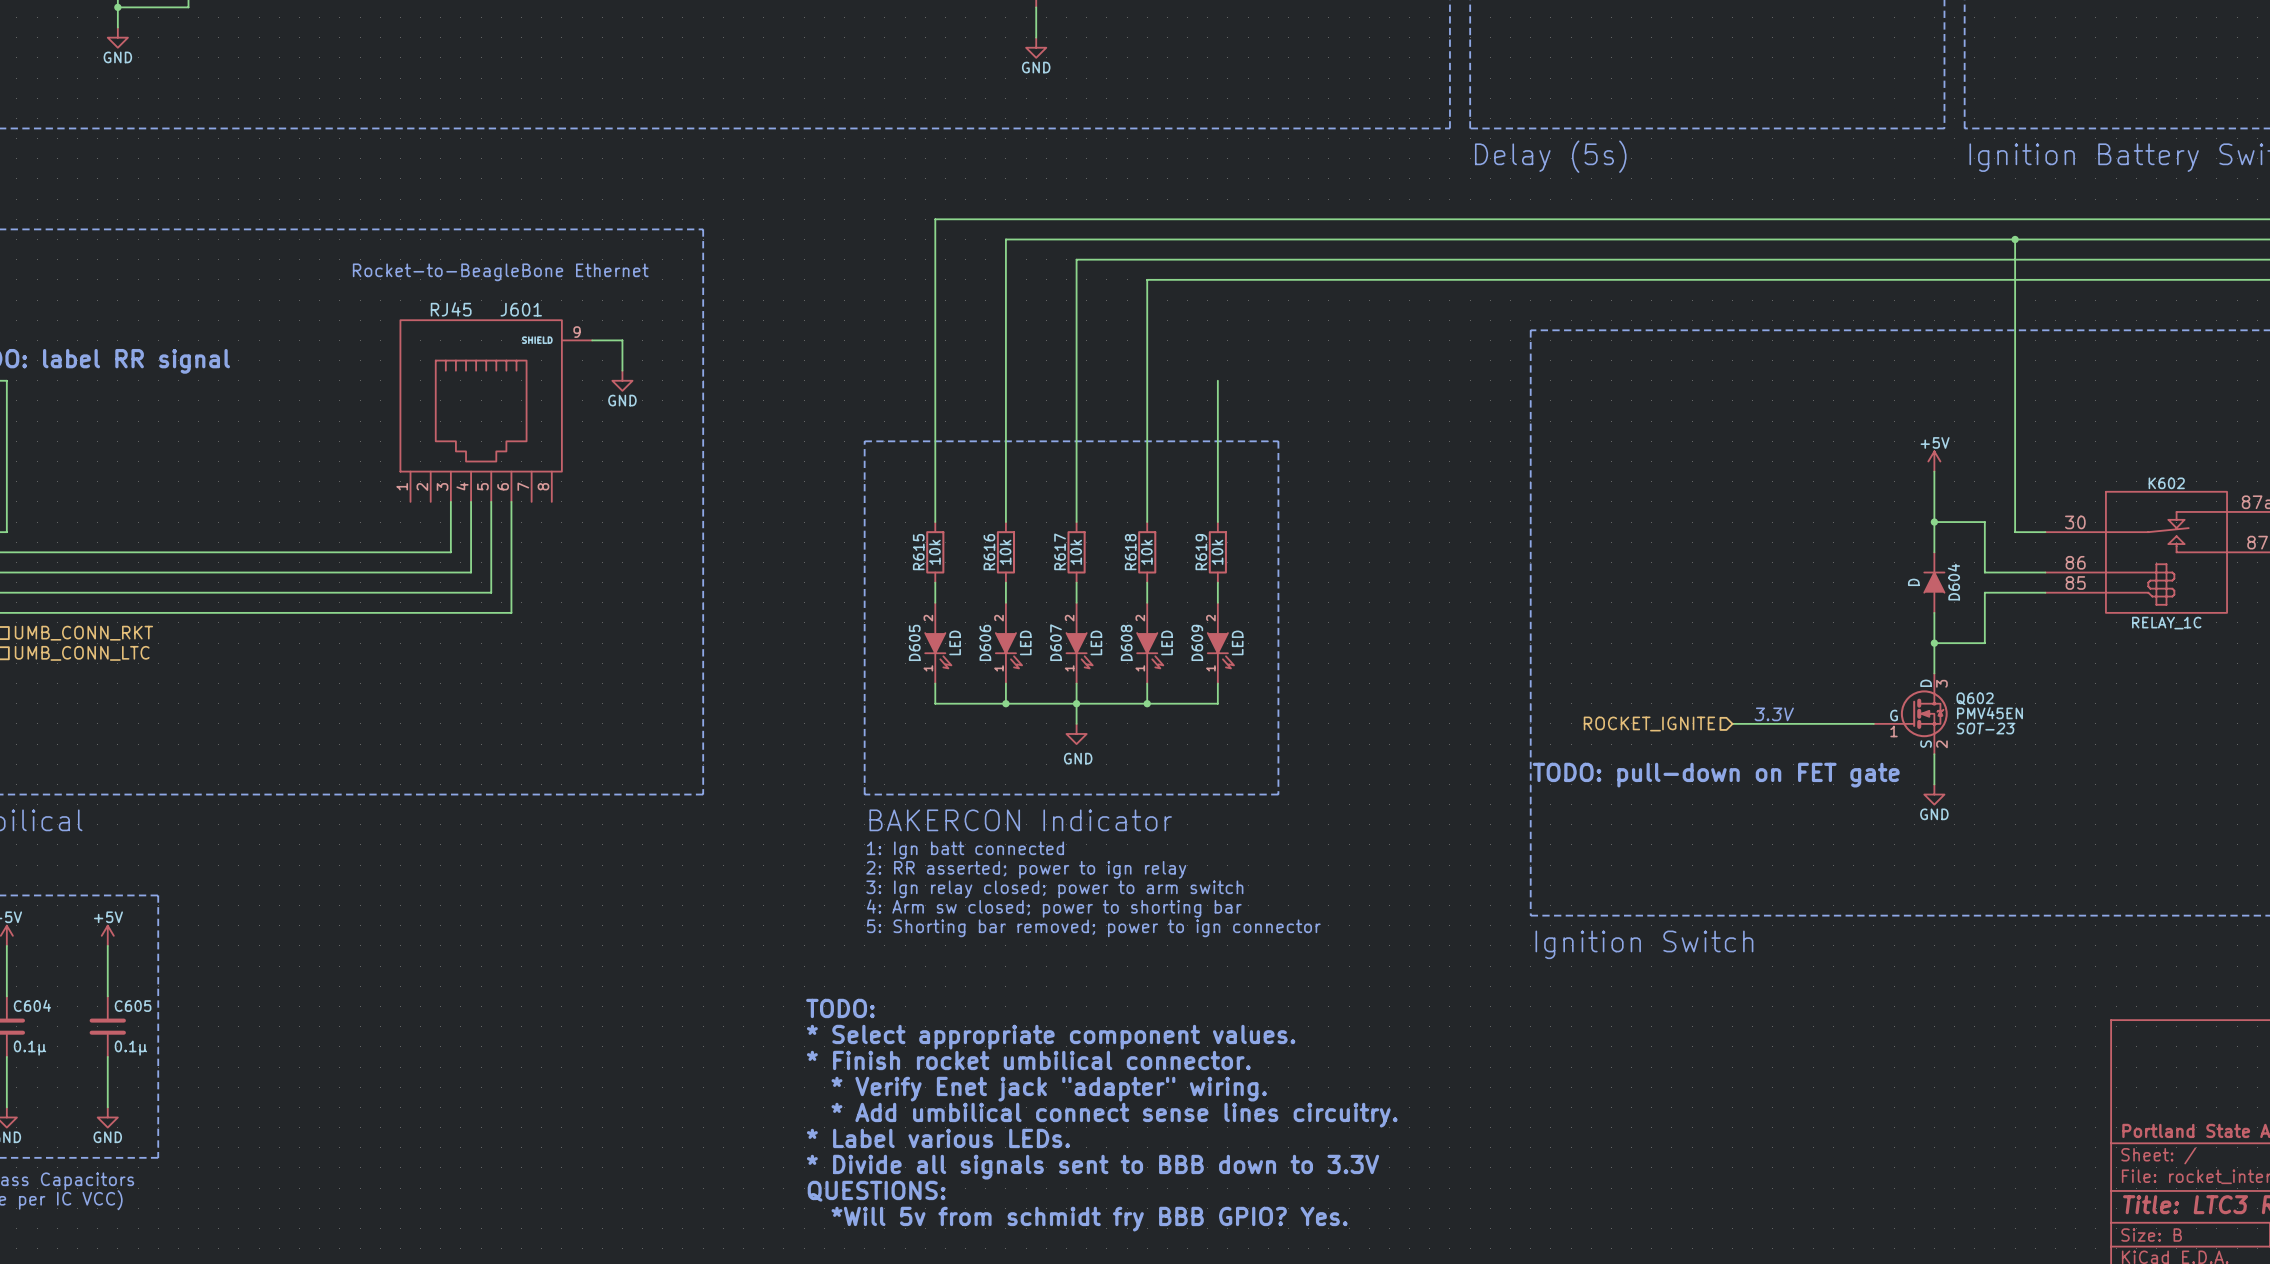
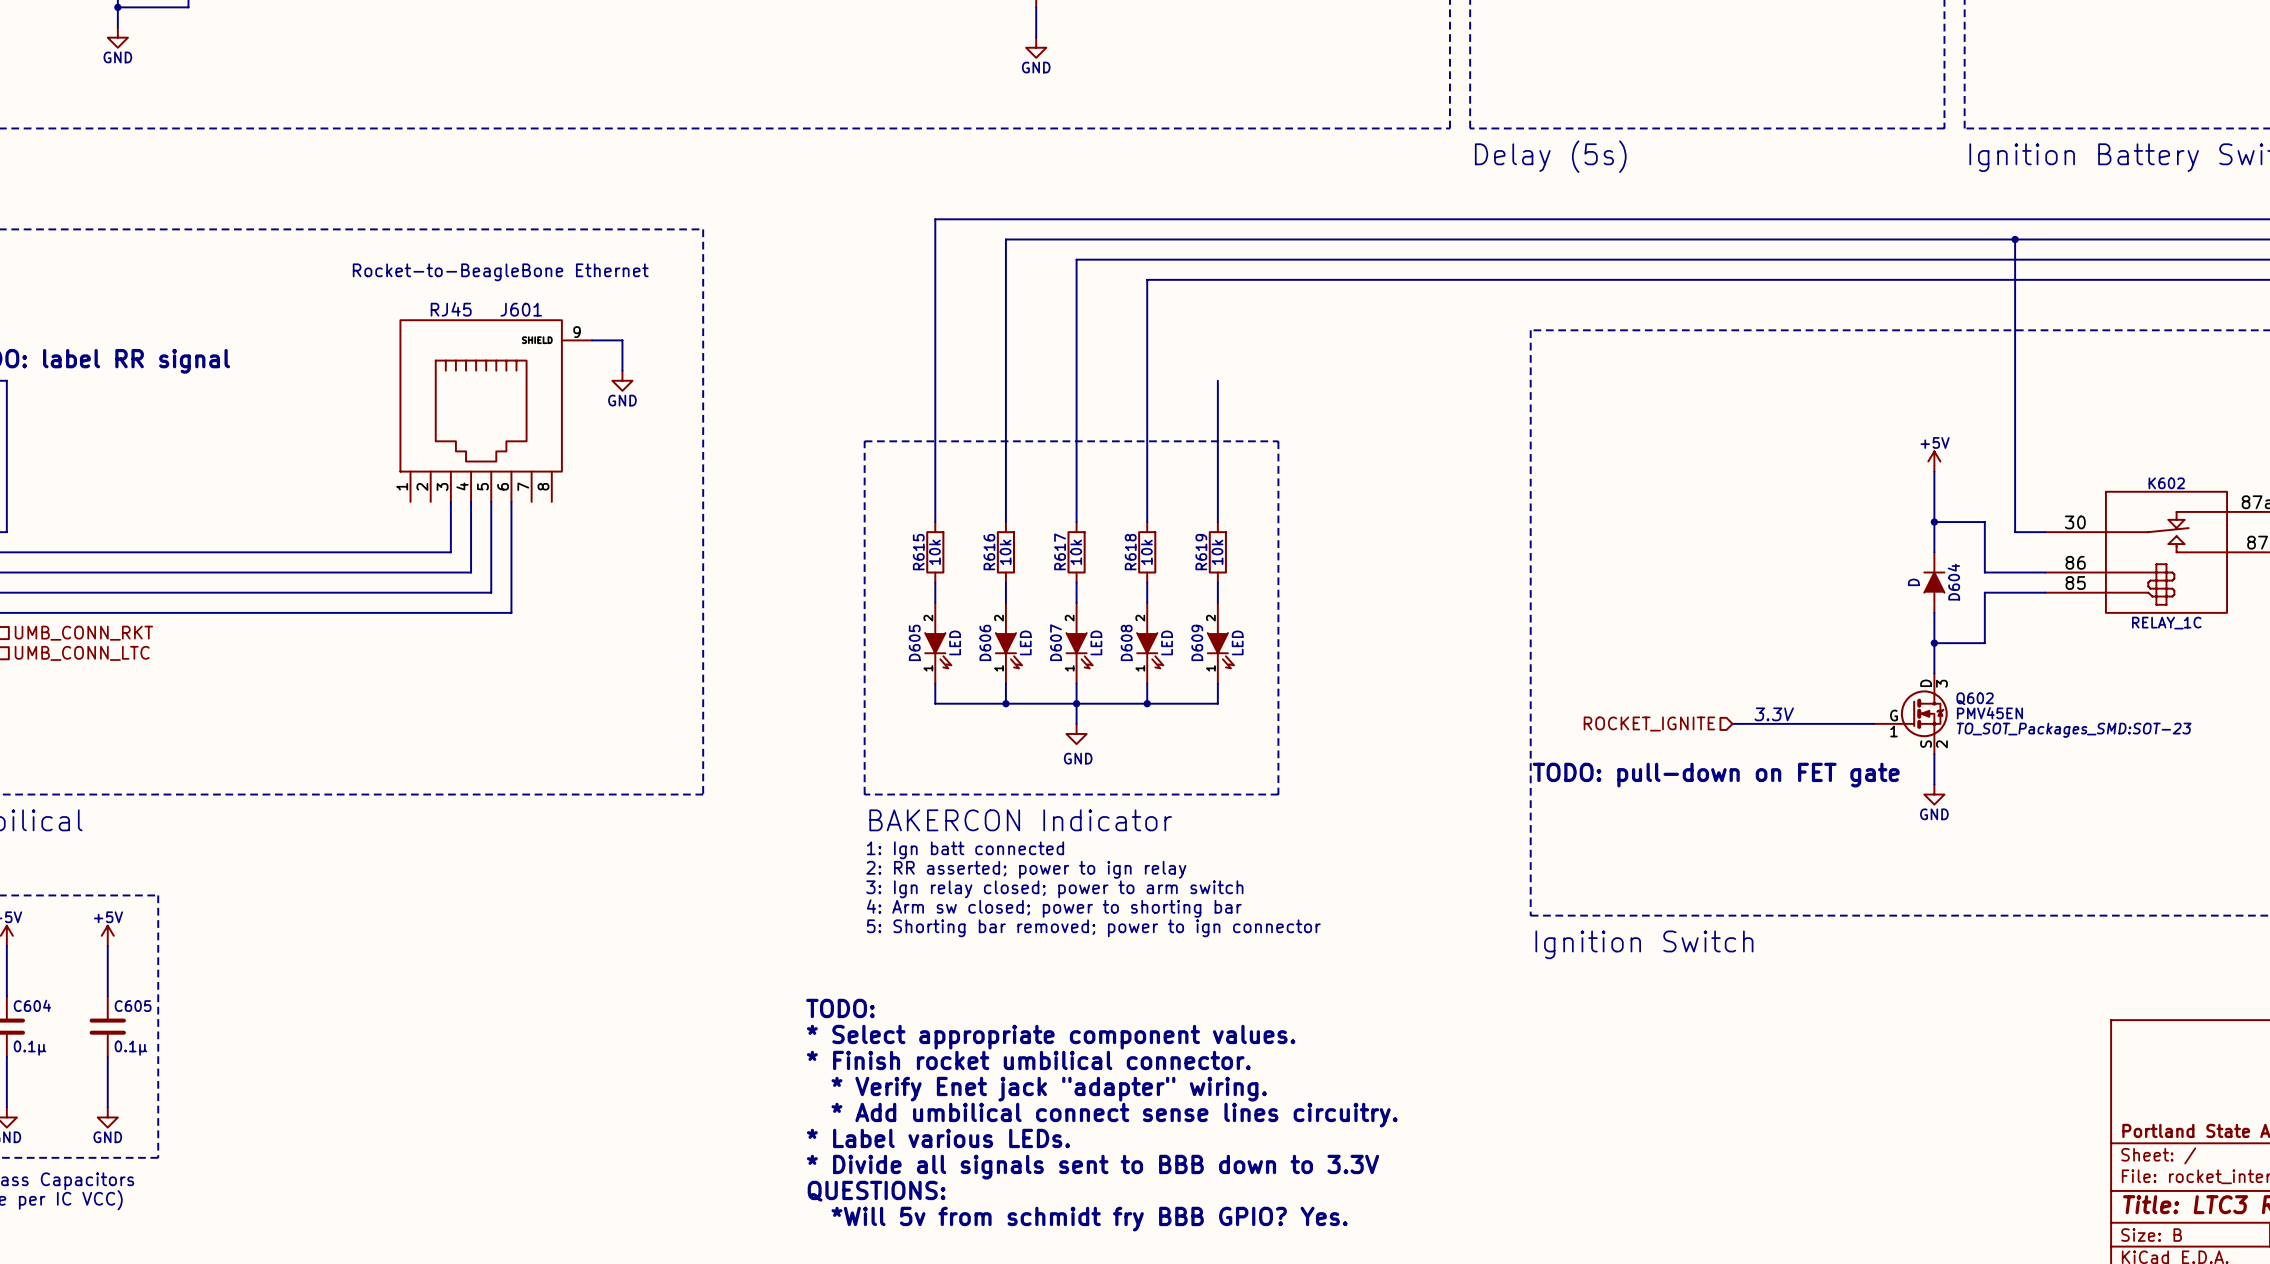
Q602 text: SOT-23 (1985, 728) -> TO_SOT_Packages_SMD:SOT-23 (2074, 730)

